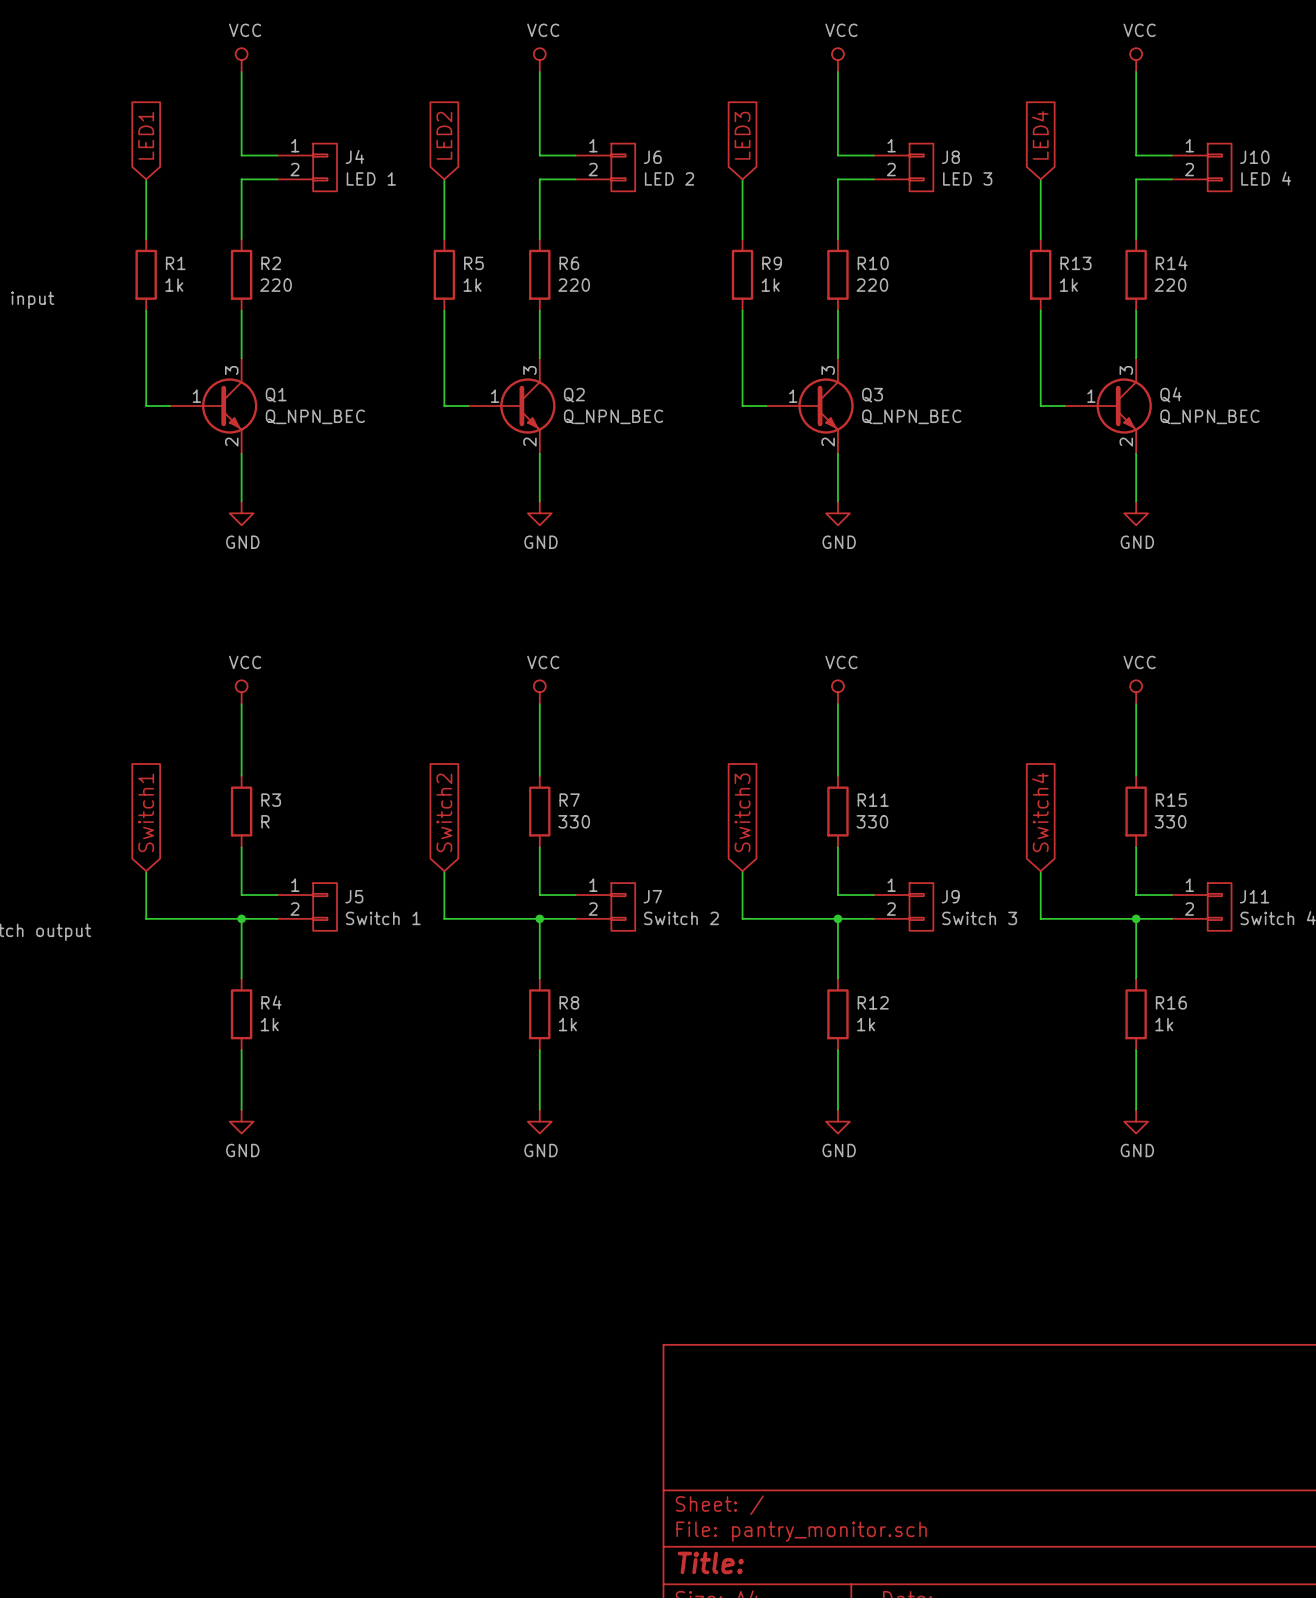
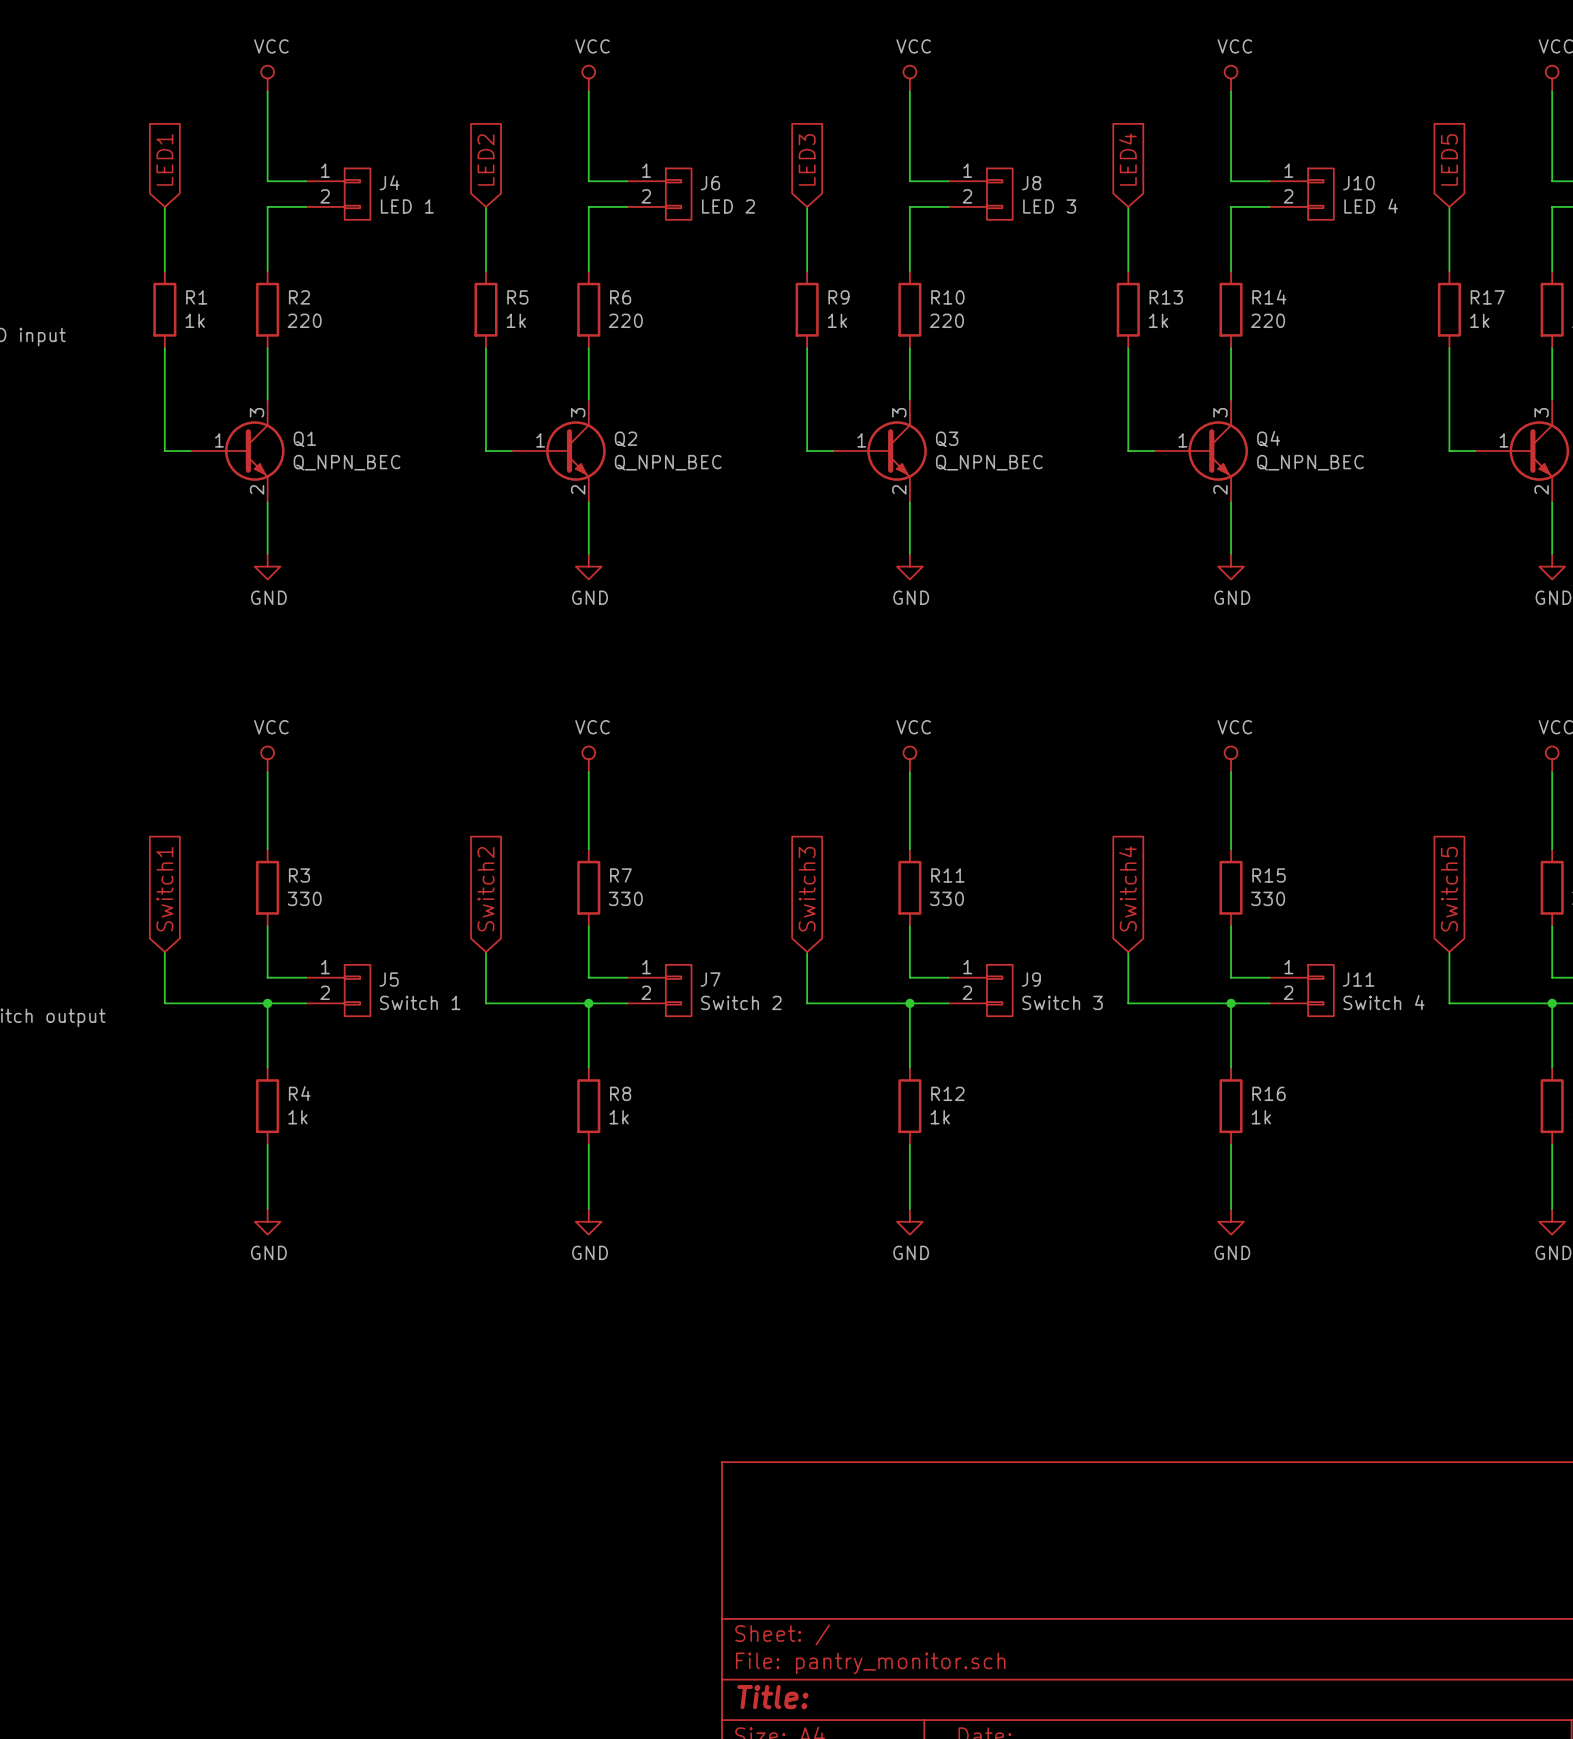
R3 value: R (265, 821) -> 330 (304, 898)

